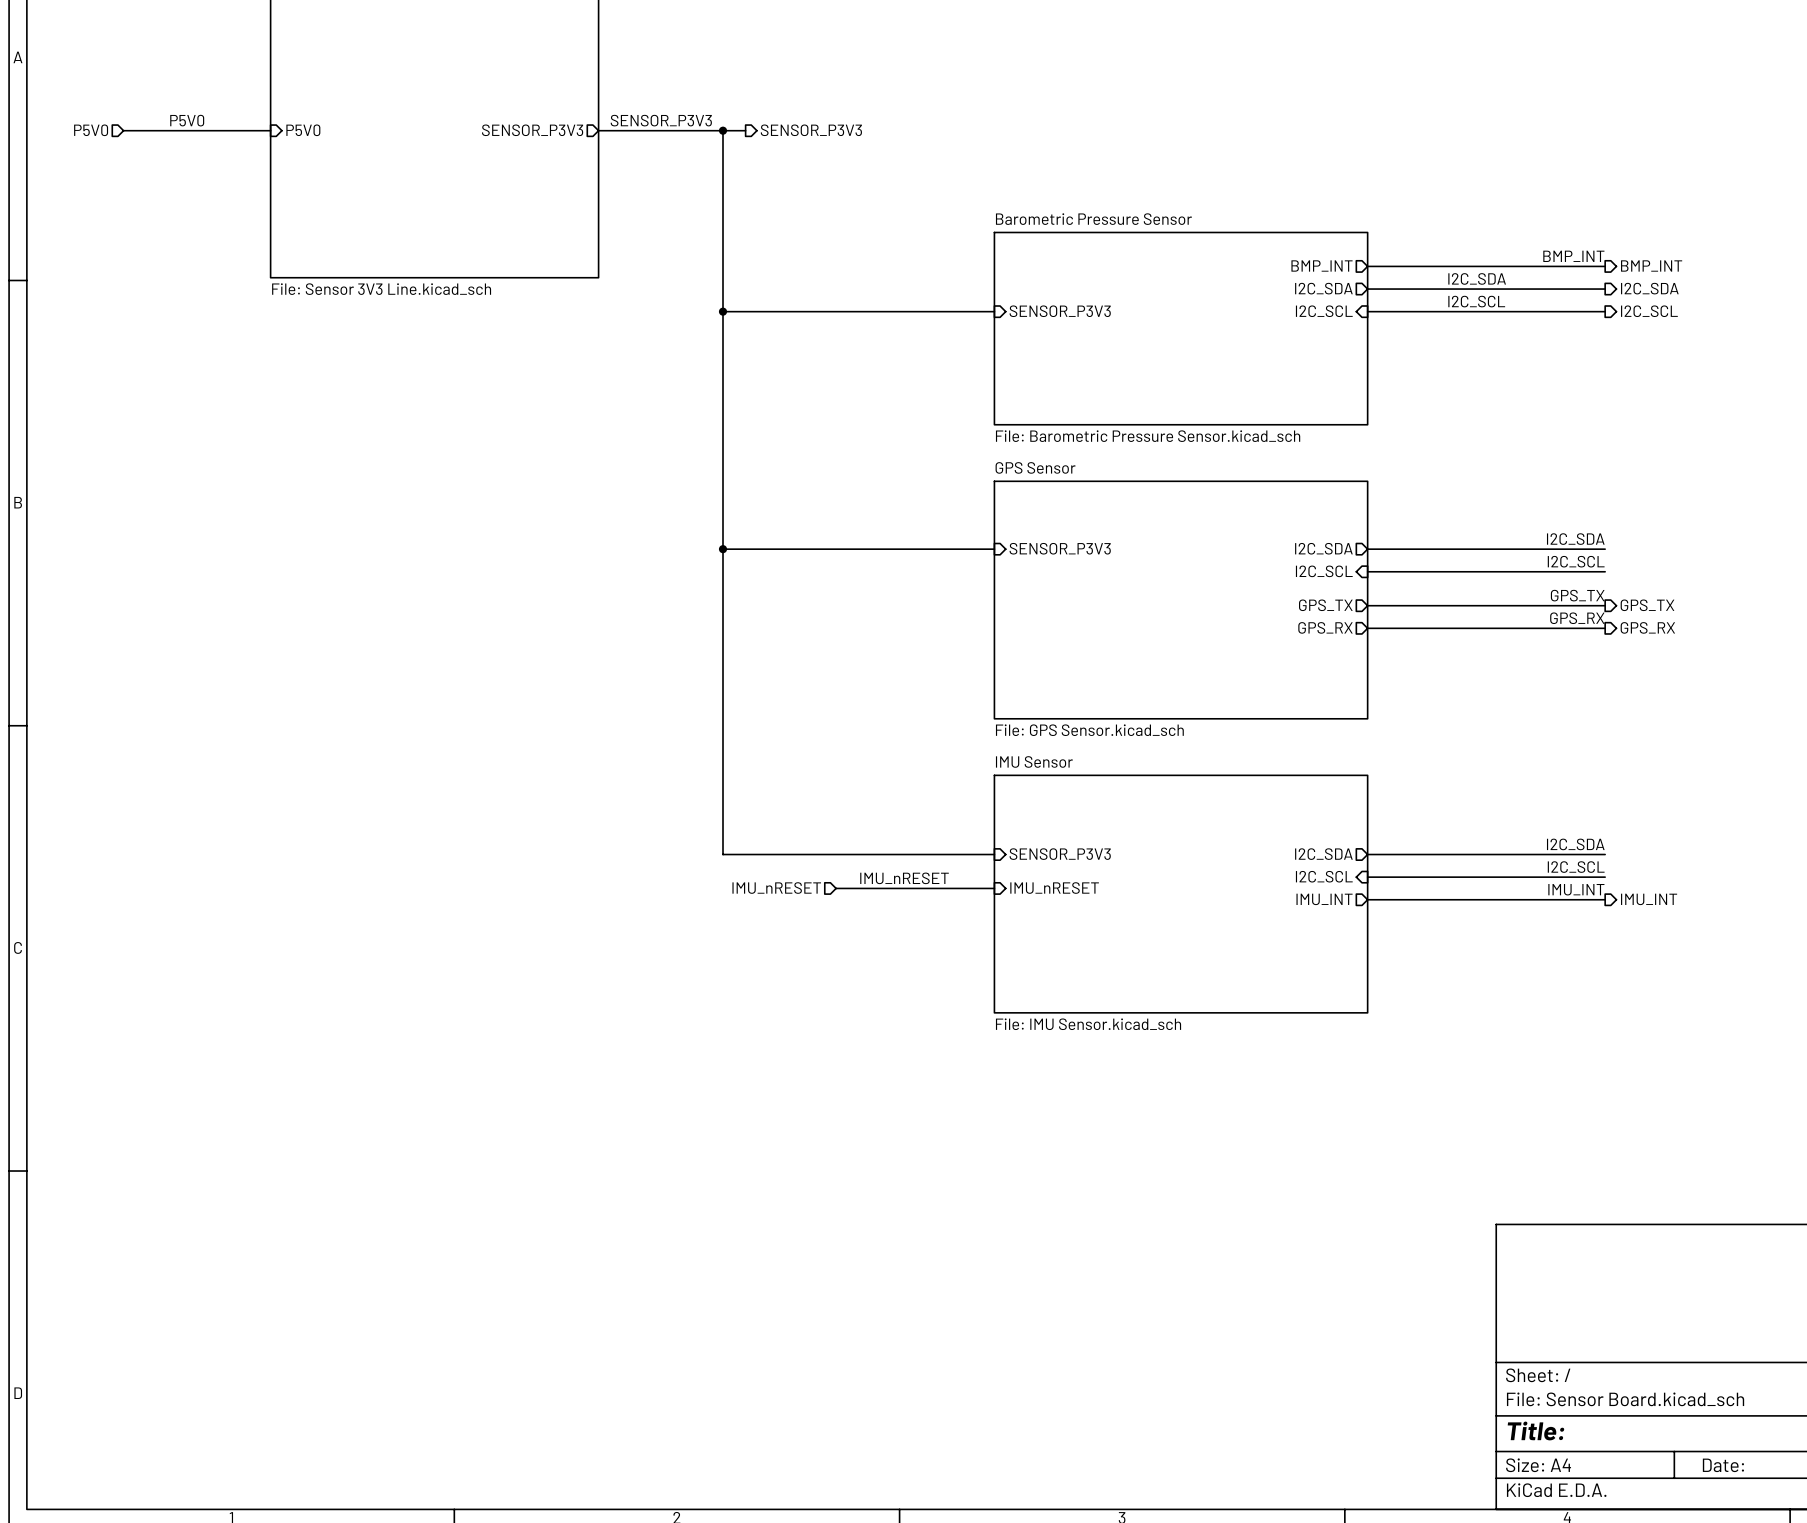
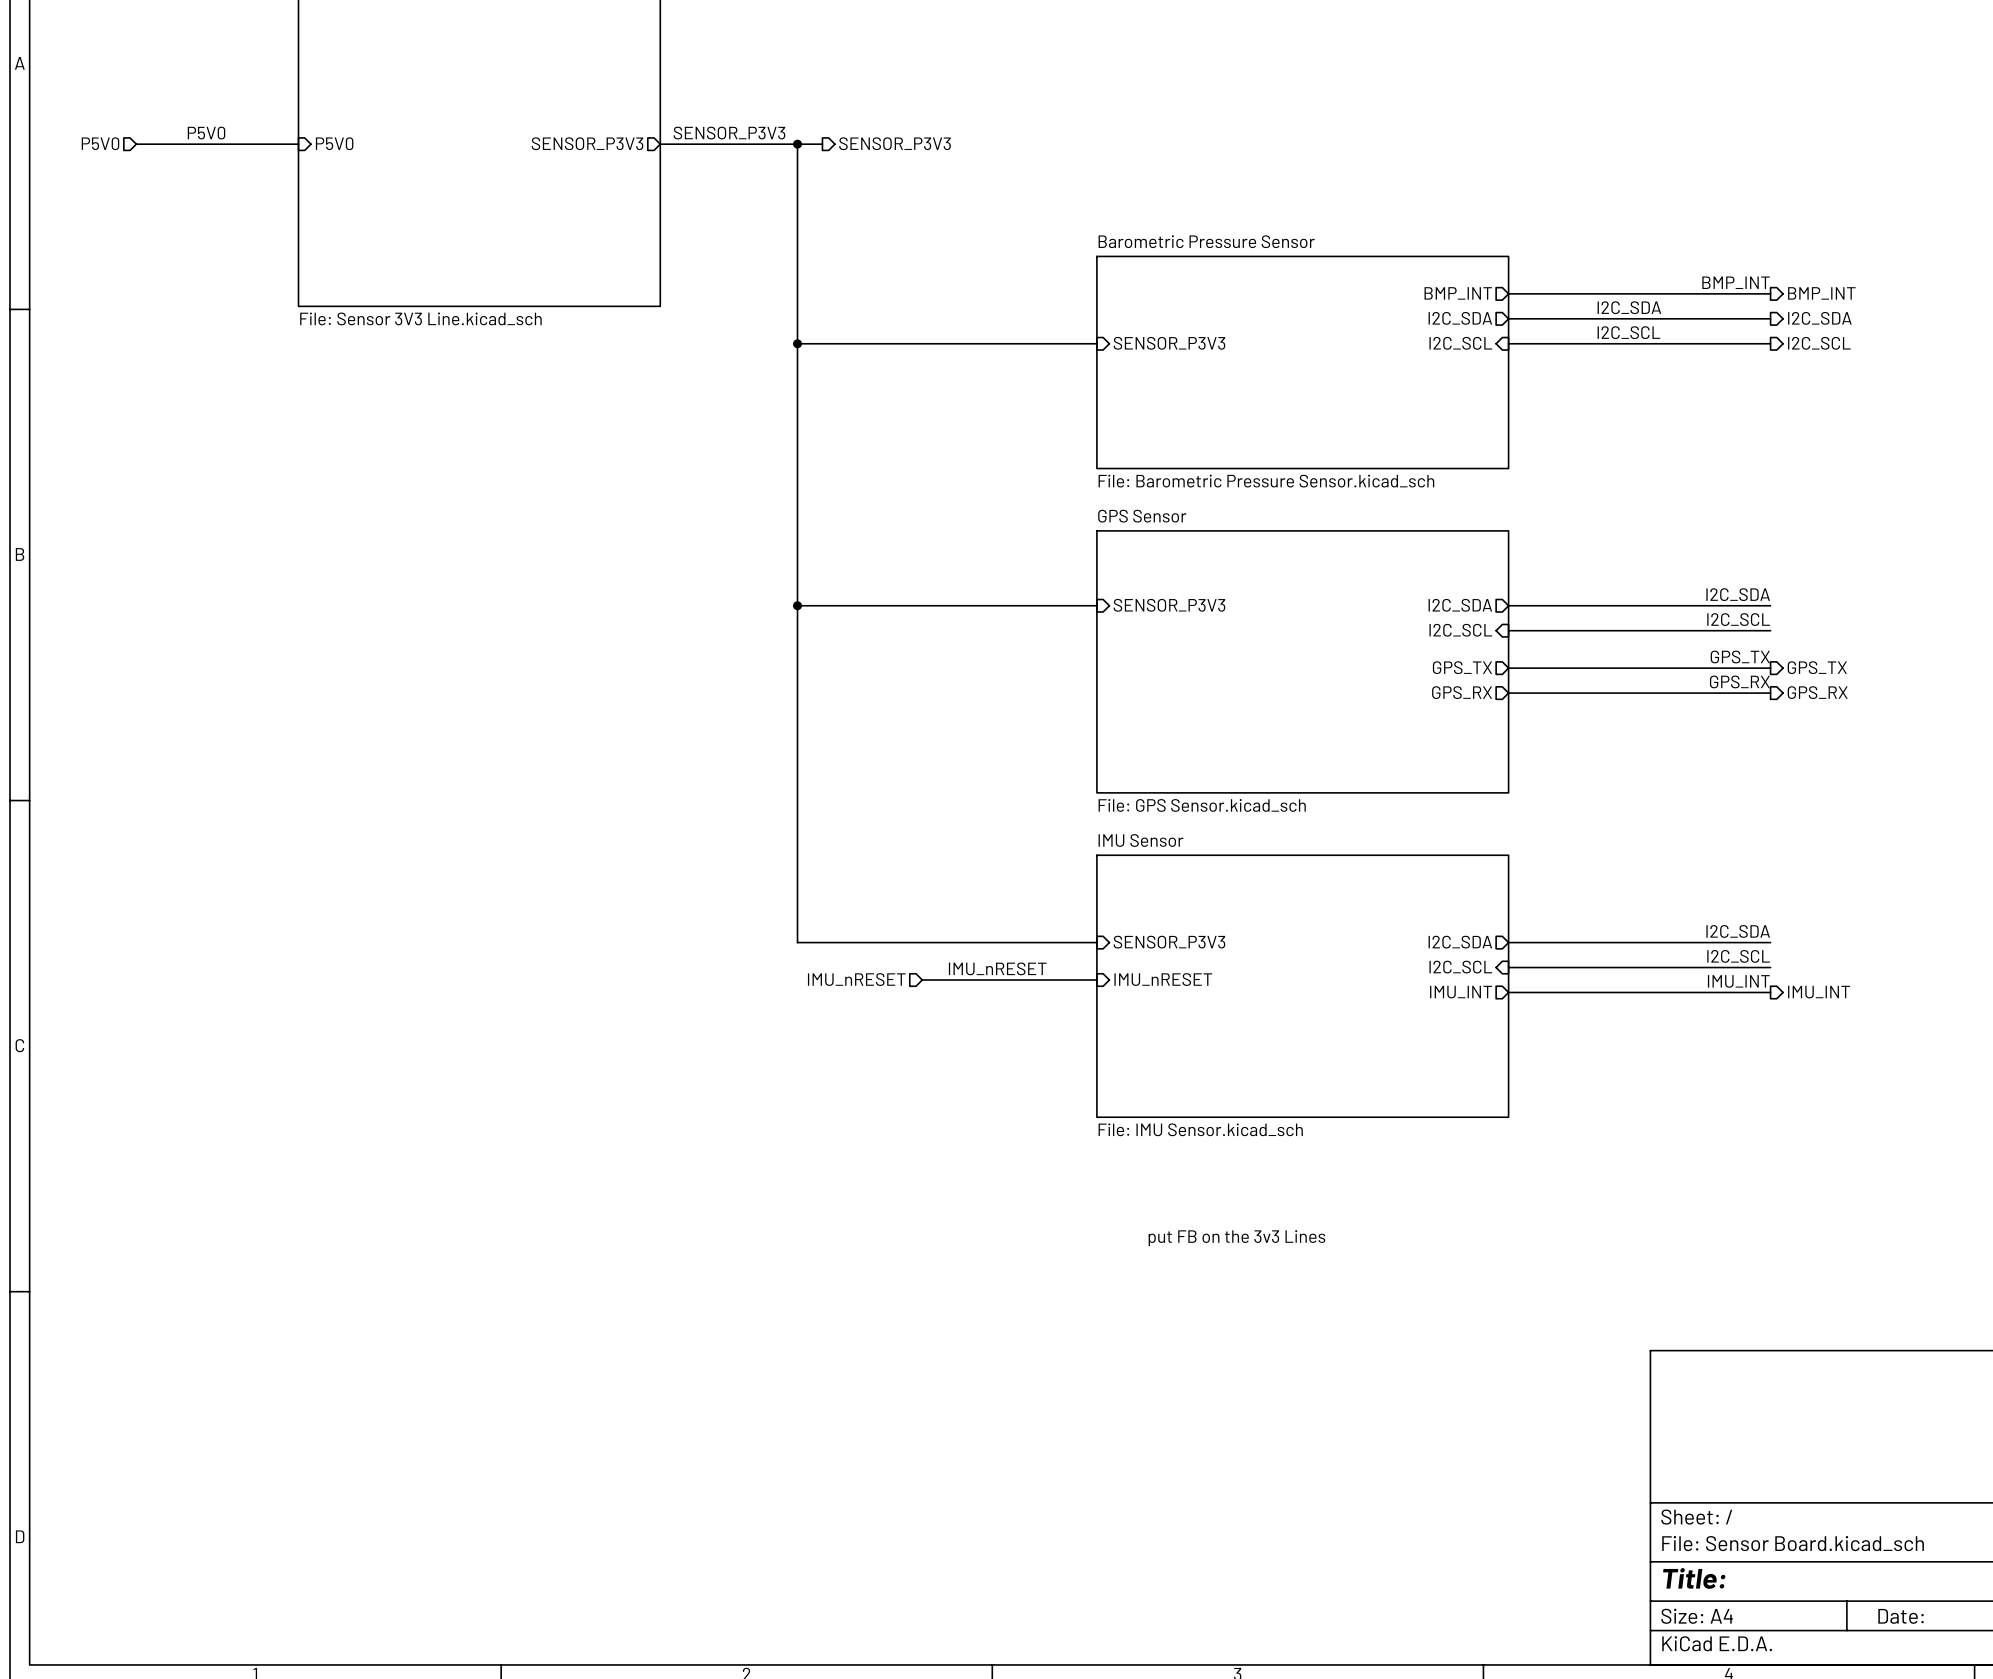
text: none -> put FB on the 3v3 Lines (1236, 1238)

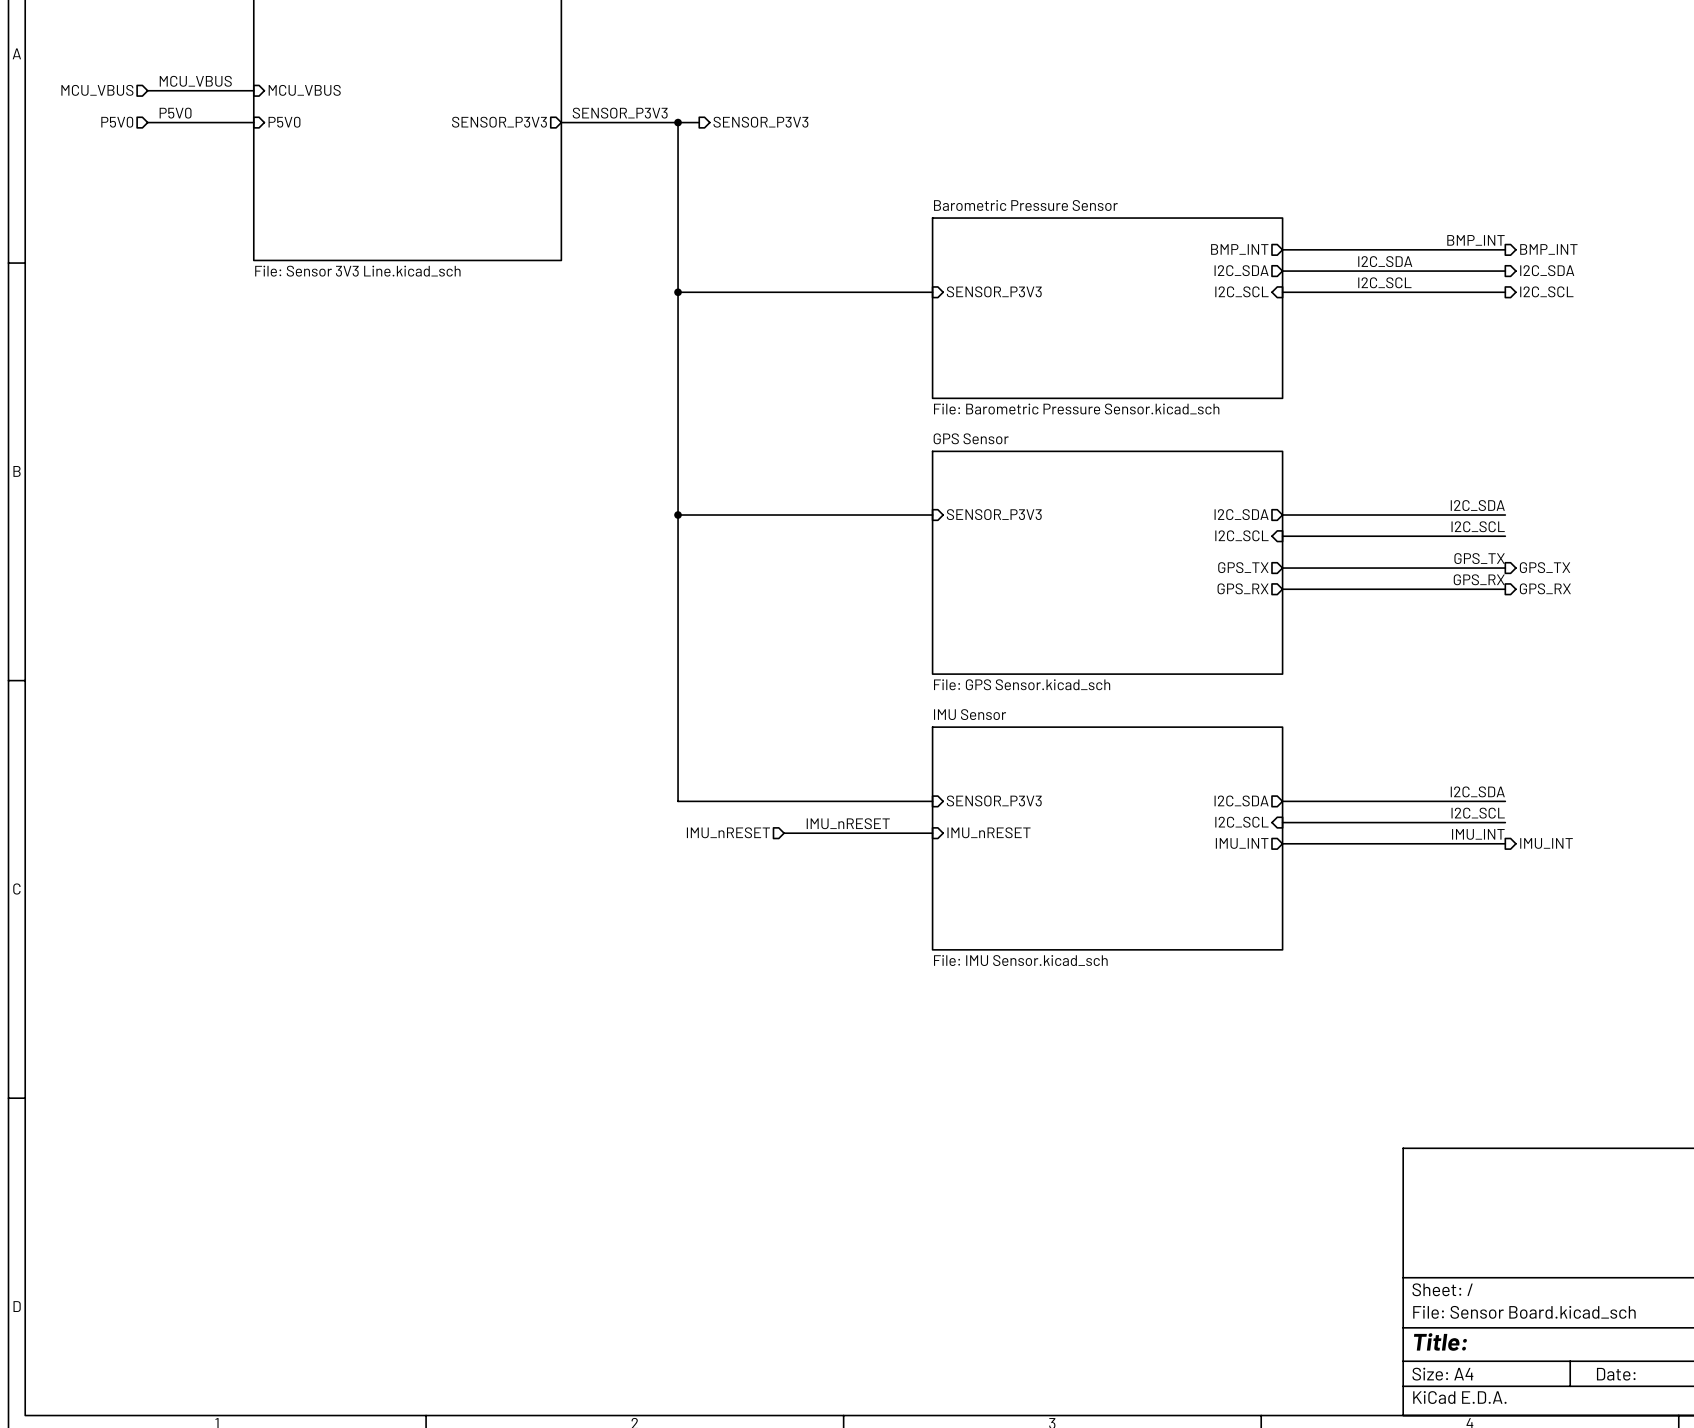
label: none -> MCU_VBUS (195, 81)
hierarchical label: none -> MCU_VBUS (97, 90)
wire: none -> (147, 90) (253, 90)
sheet pin: none -> MCU_VBUS (304, 90)
hierarchical label position: P5V0 (100, 143) -> P5V0 (117, 122)
wire: (136, 144) (173, 144) -> none
text: put FB on the 3v3 Lines (1236, 1238) -> none

